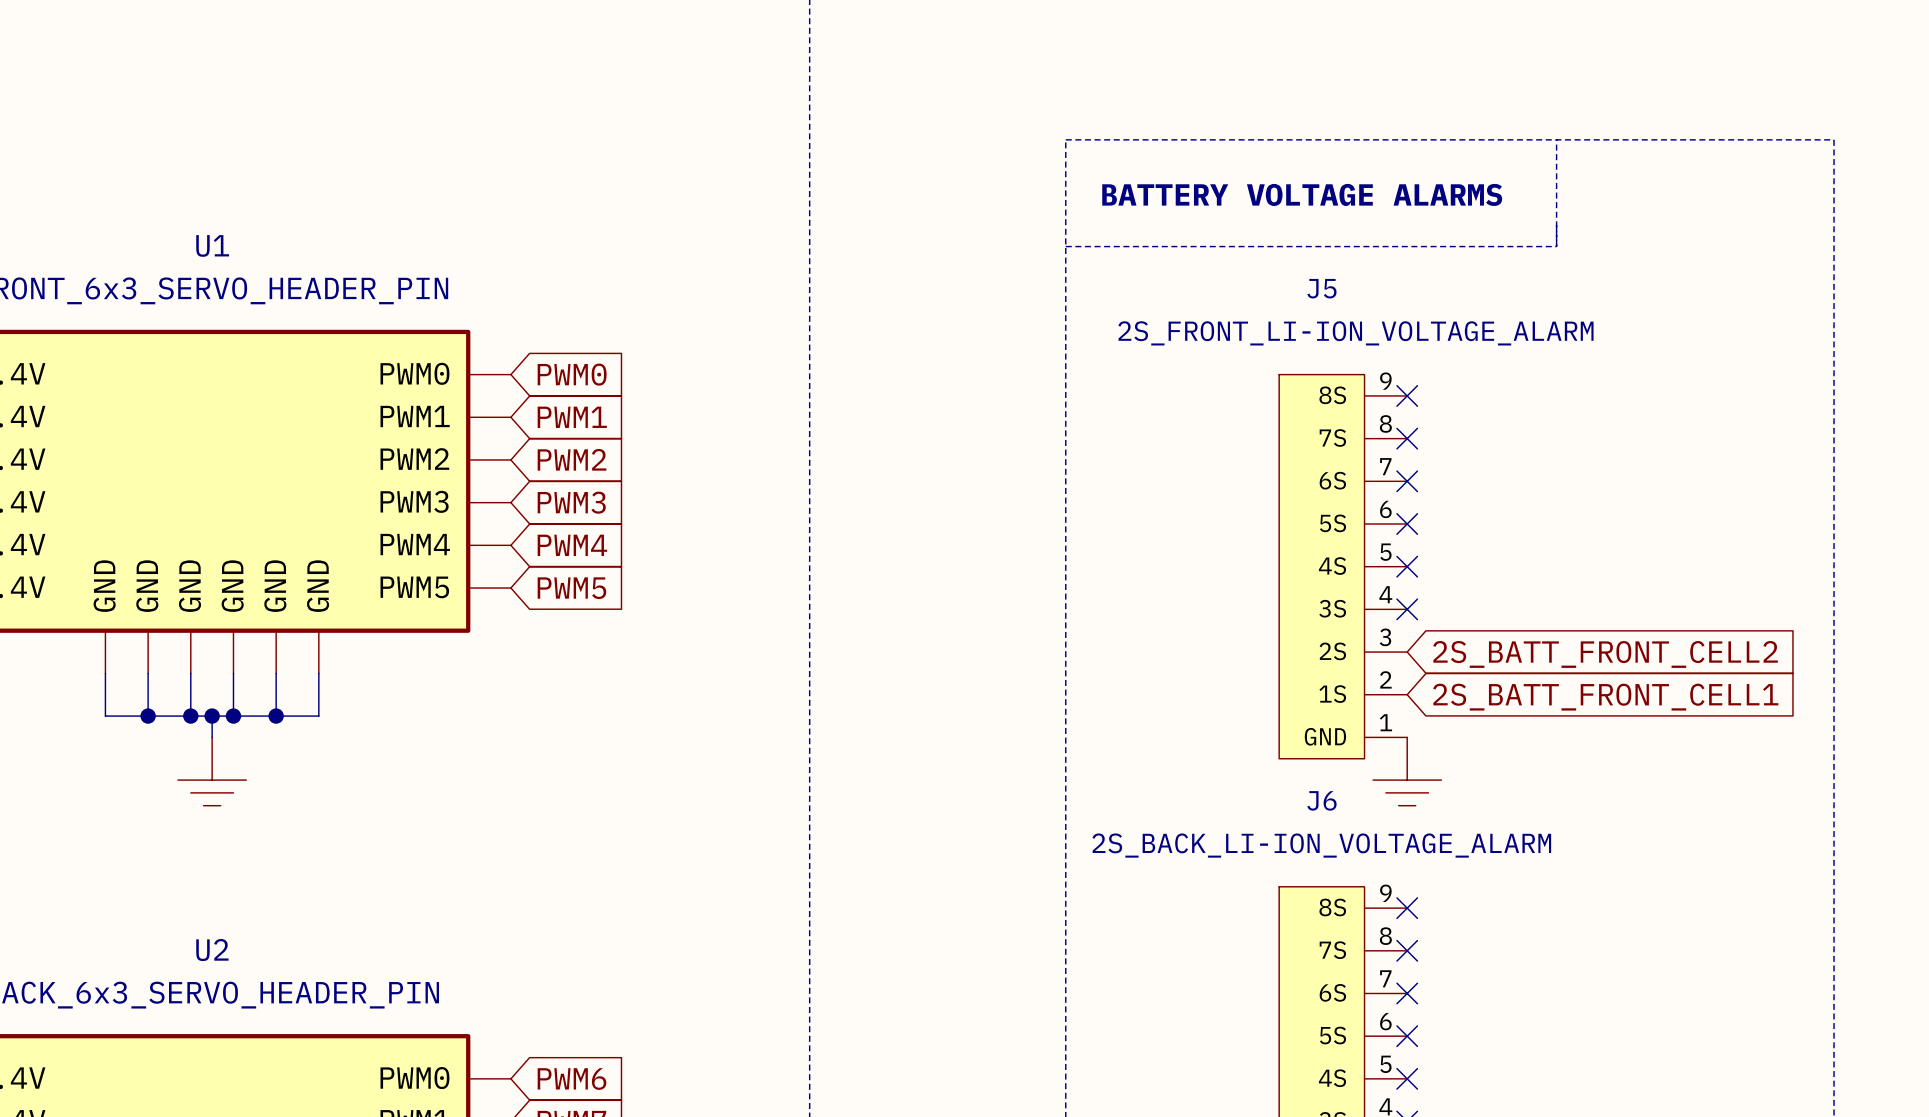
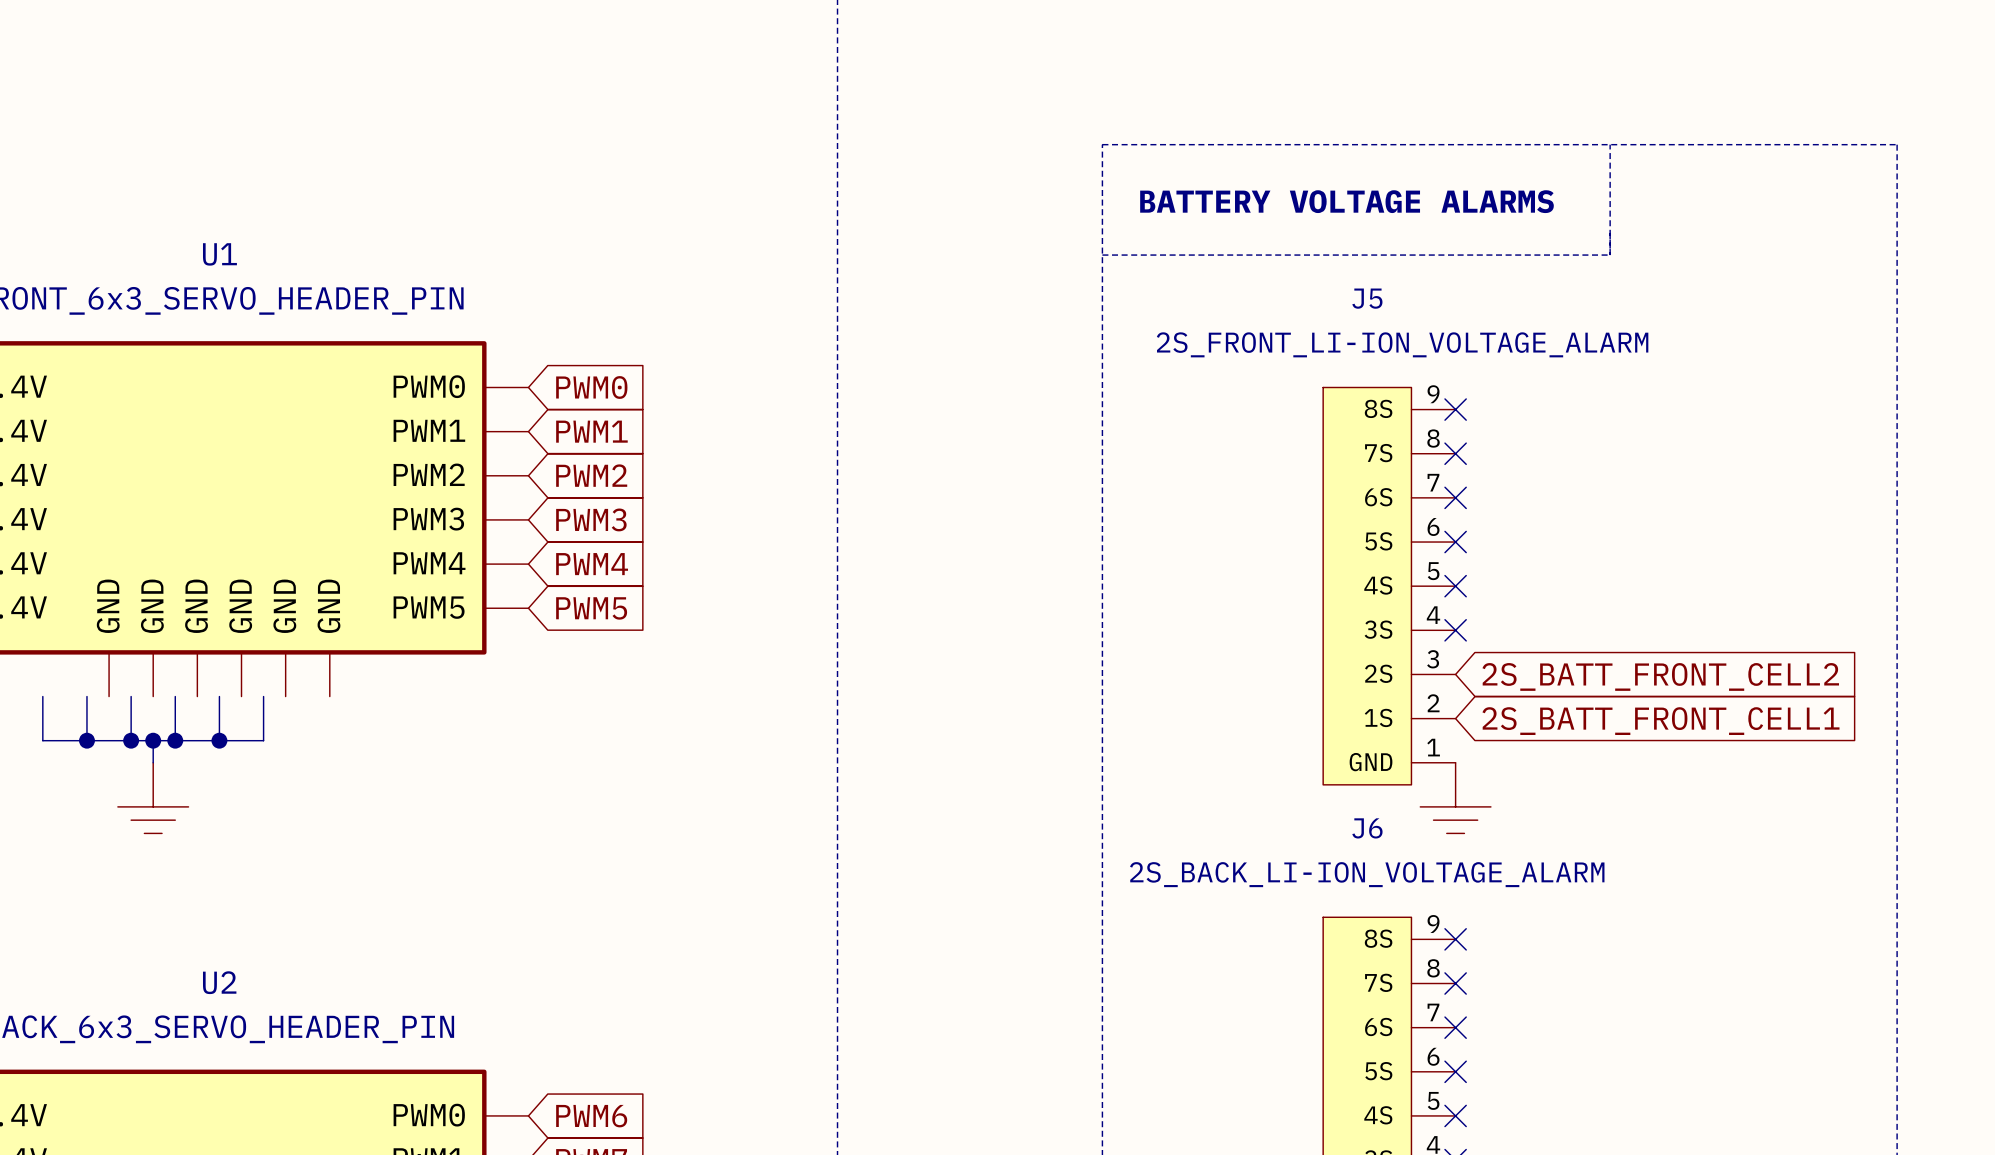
wire: (105, 673) (105, 716) -> (42, 696) (42, 740) (109, 740)
wire: (148, 673) (148, 716) -> (153, 762) (153, 740)
wire: (190, 673) (190, 716) -> (131, 696) (131, 740)
wire: (233, 673) (233, 716) -> (175, 696) (175, 740)
wire: (276, 673) (276, 716) -> (86, 696) (86, 740)
wire: (318, 673) (318, 716) (254, 716) -> (263, 696) (263, 740)
junction: none -> (86, 740)
junction: none -> (131, 740)
junction position: (190, 716) -> (175, 740)
wire: (212, 716) (212, 737) -> (219, 740) (219, 696)
junction: (233, 716) -> none
junction: (276, 716) -> none
power symbol position: (212, 771) -> (153, 798)

